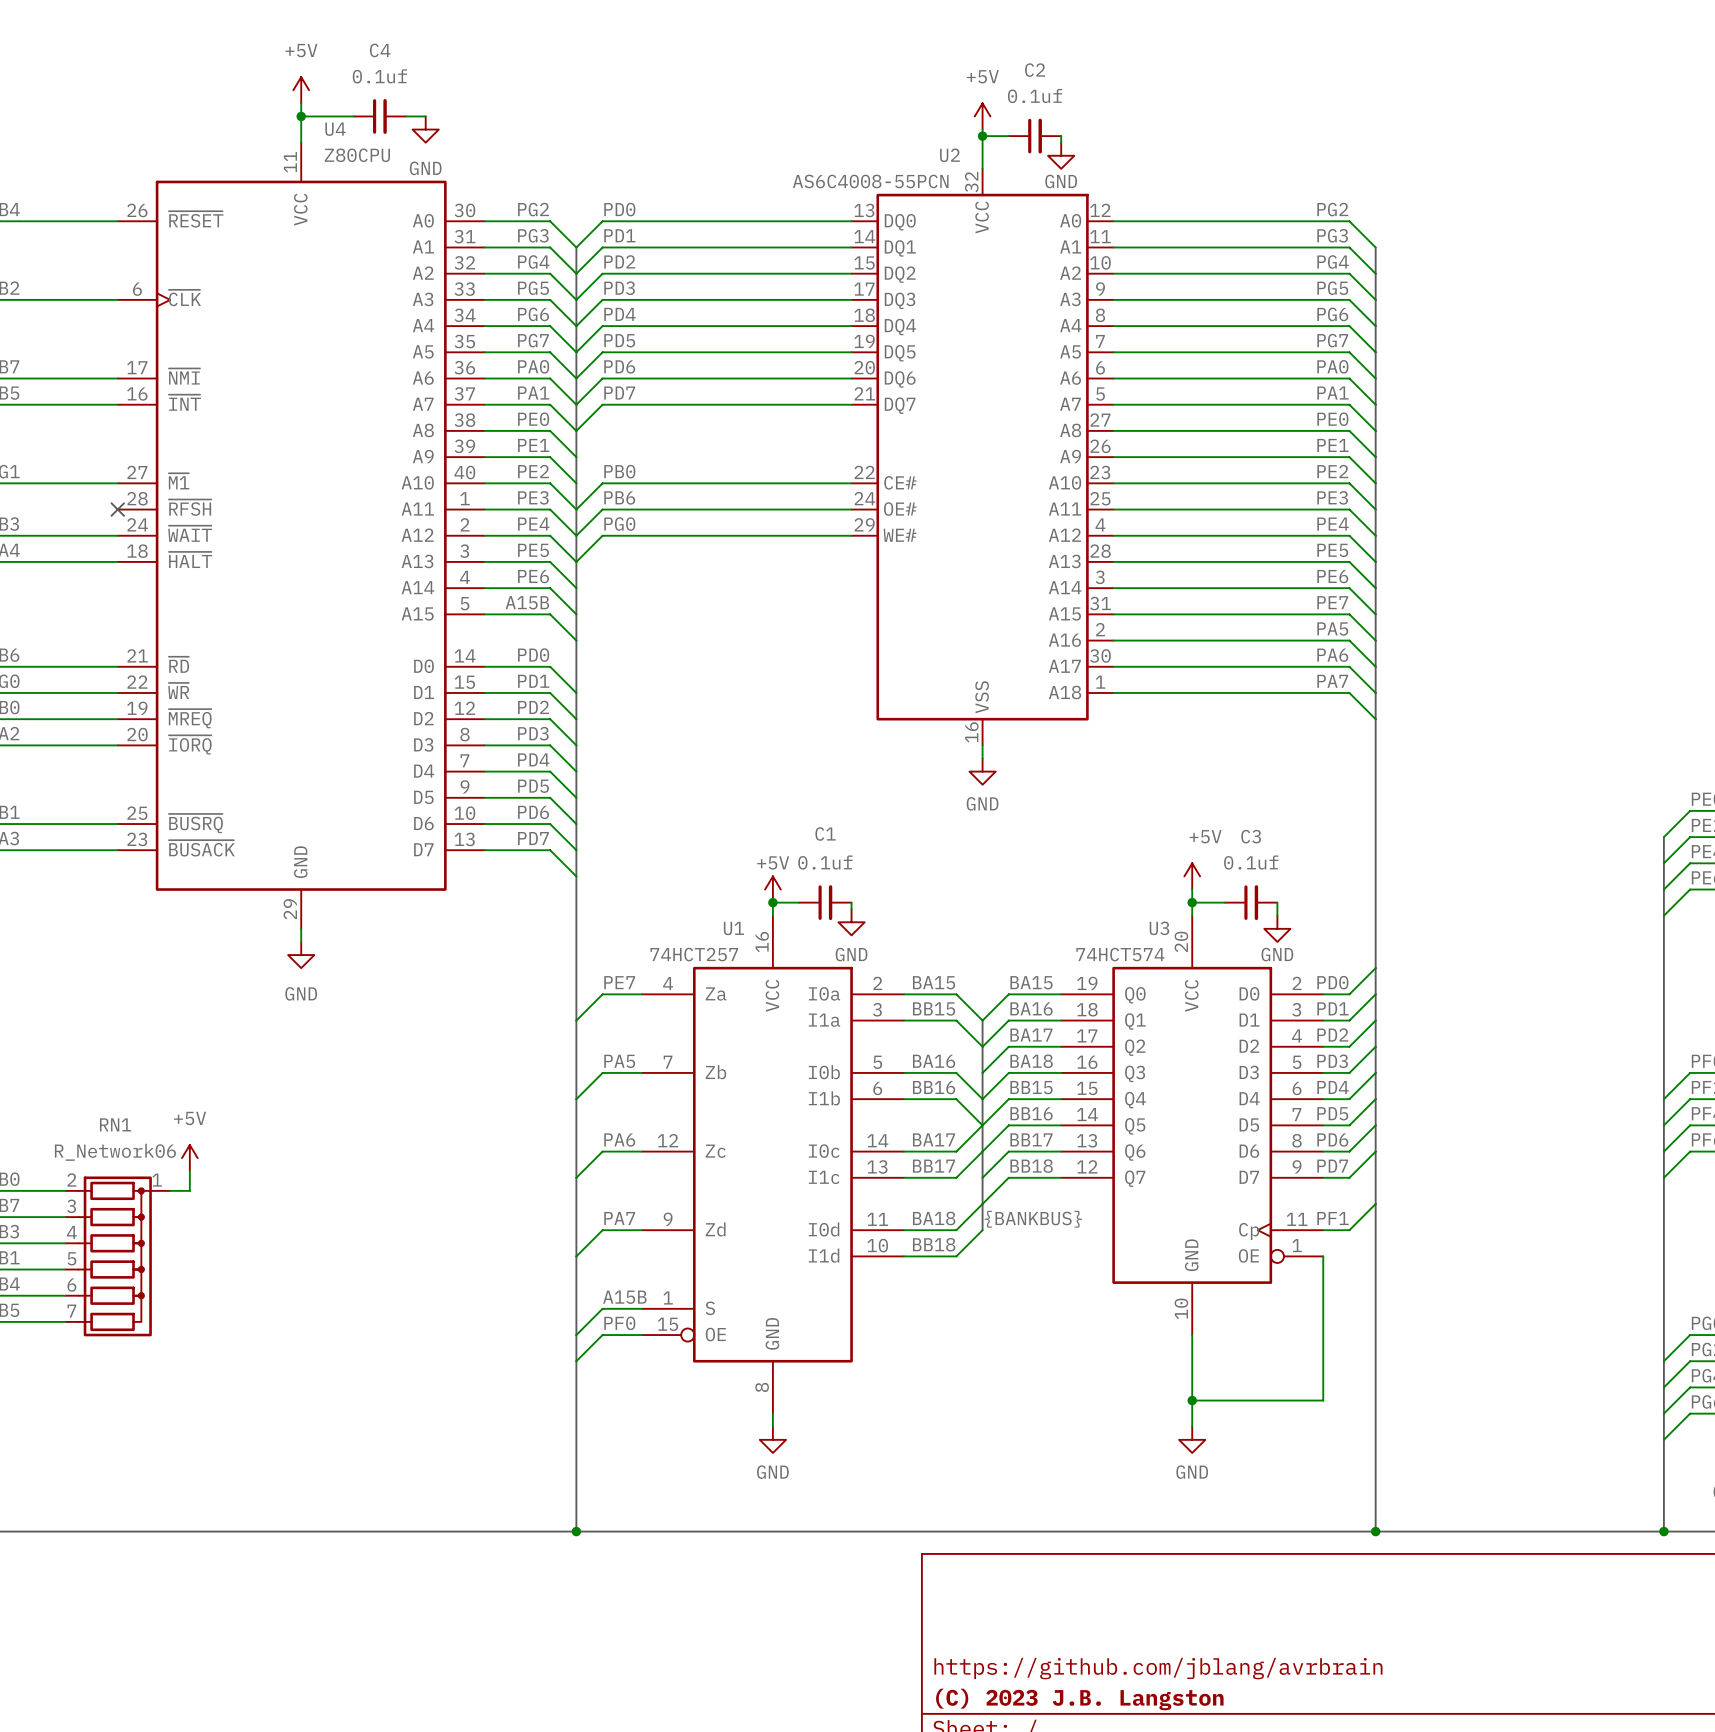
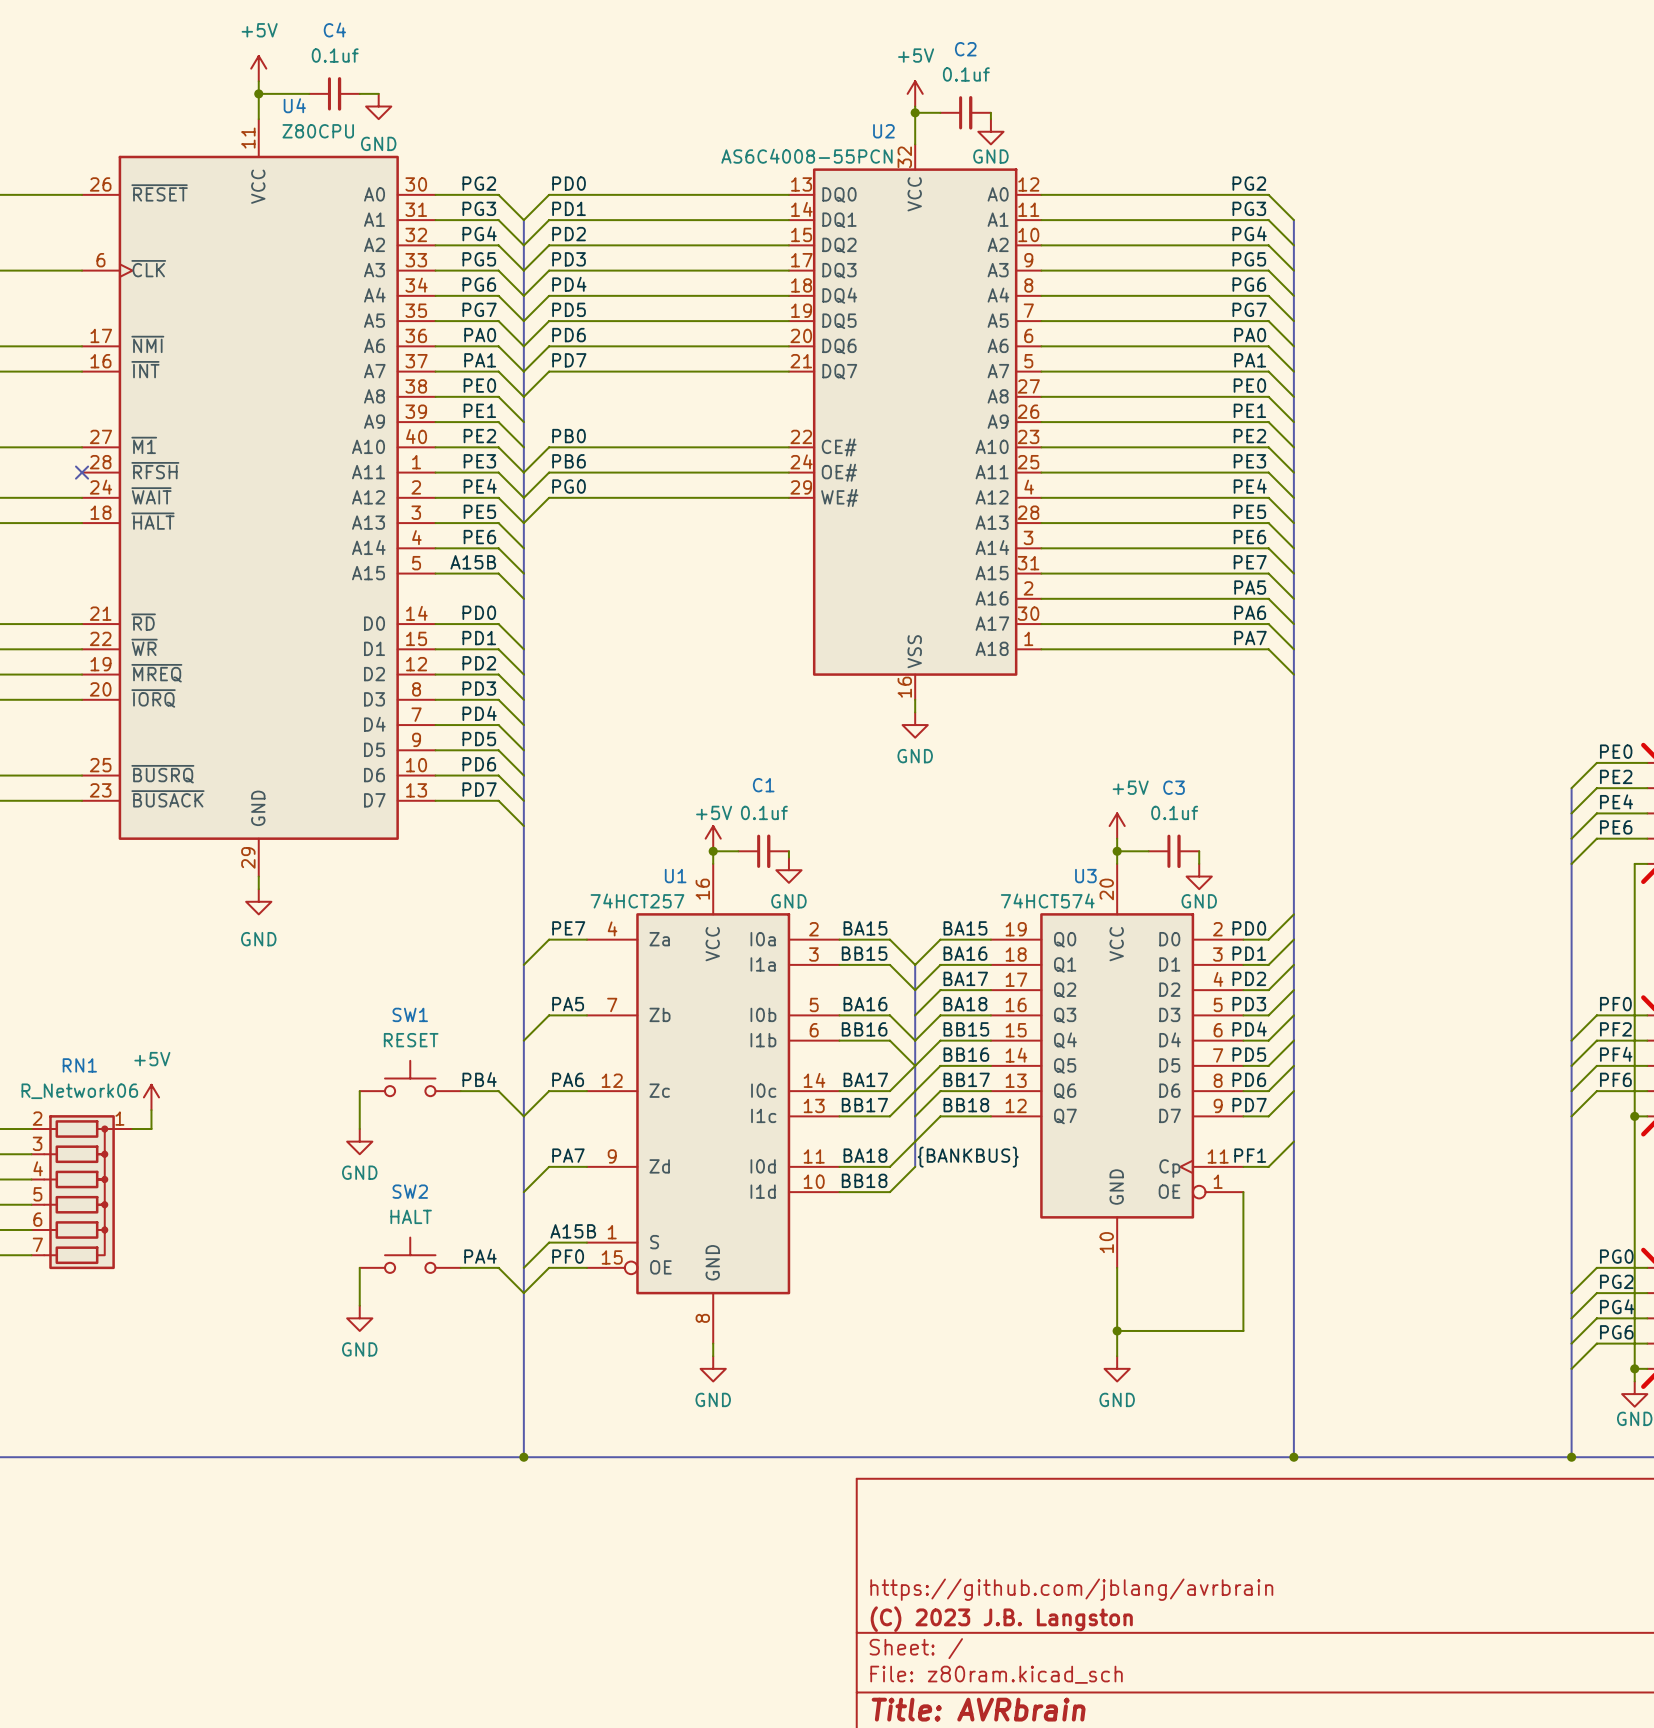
SW1: none -> RESET (410, 1078)
label: none -> PB4 (479, 1079)
wire: none -> (359, 1091) (359, 1129)
wire: none -> (460, 1091) (498, 1091) (523, 1116)
power symbol: none -> GND (359, 1141)
SW2: none -> HALT (410, 1255)
label: none -> PA4 (480, 1256)
wire: none -> (359, 1267) (359, 1305)
wire: none -> (460, 1267) (498, 1267) (523, 1293)
power symbol: none -> GND (359, 1318)

